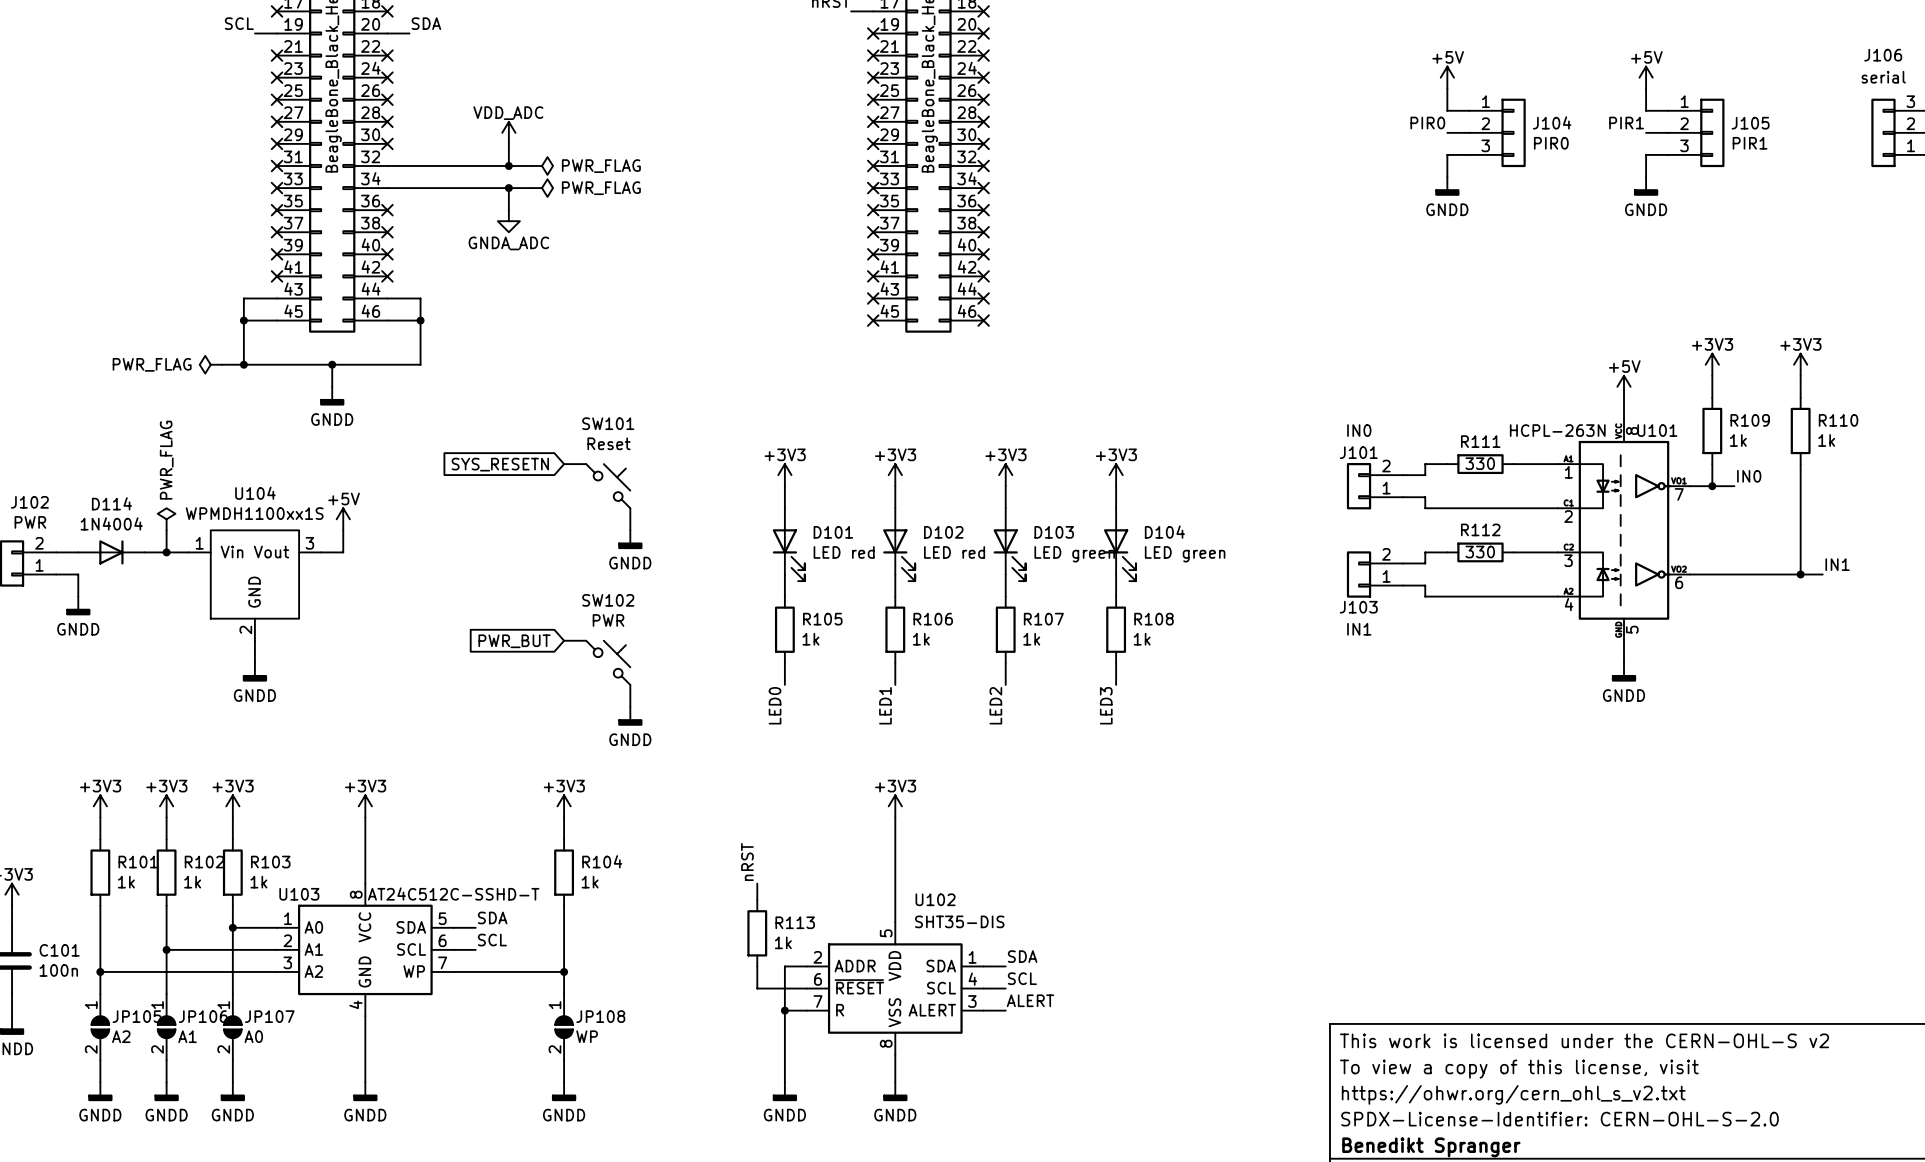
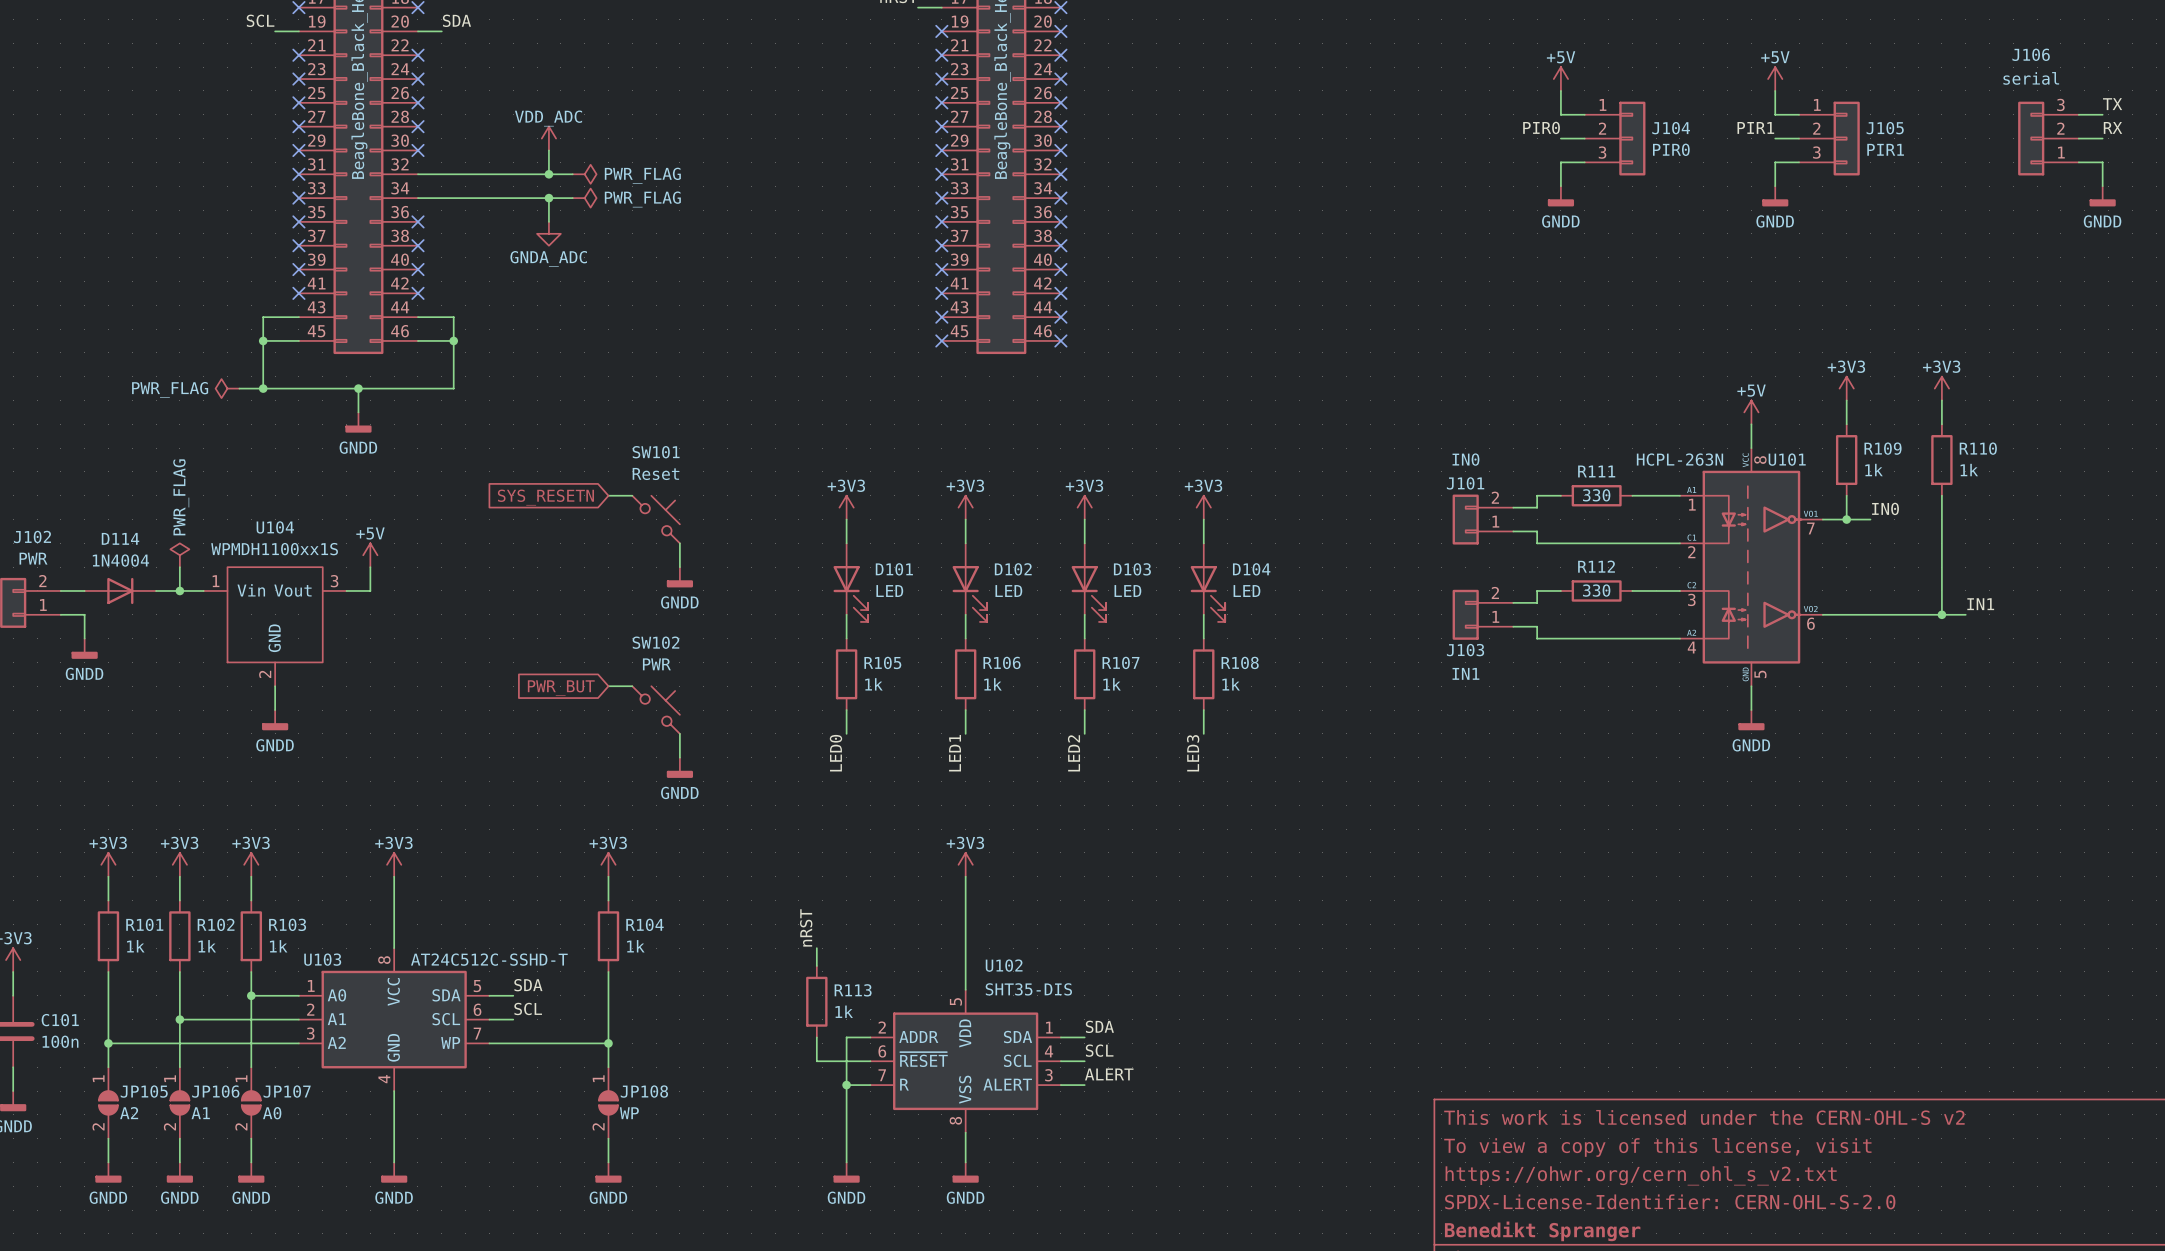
D101 value: LED red (844, 552) -> LED (889, 591)
D102 value: LED red (954, 552) -> LED (1008, 591)
D103 value: LED green (1074, 554) -> LED (1127, 591)
D104 value: LED green (1185, 554) -> LED (1246, 591)

